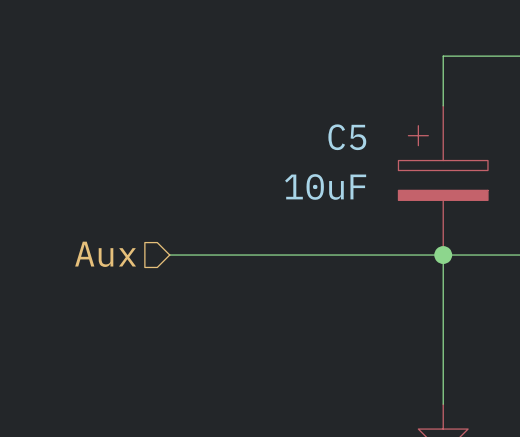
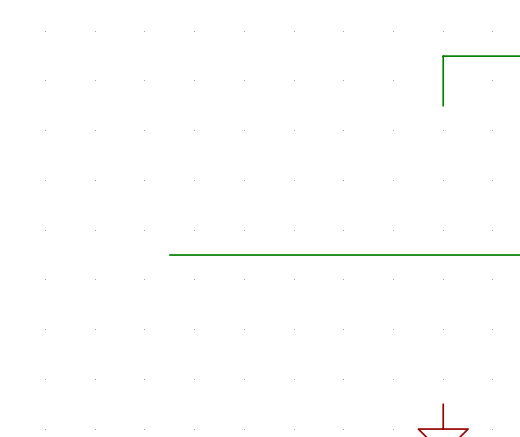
C5: 10uF (443, 180) -> none
hierarchical label: Aux (105, 254) -> none
wire: (443, 255) (443, 404) -> none
junction: (443, 255) -> none

